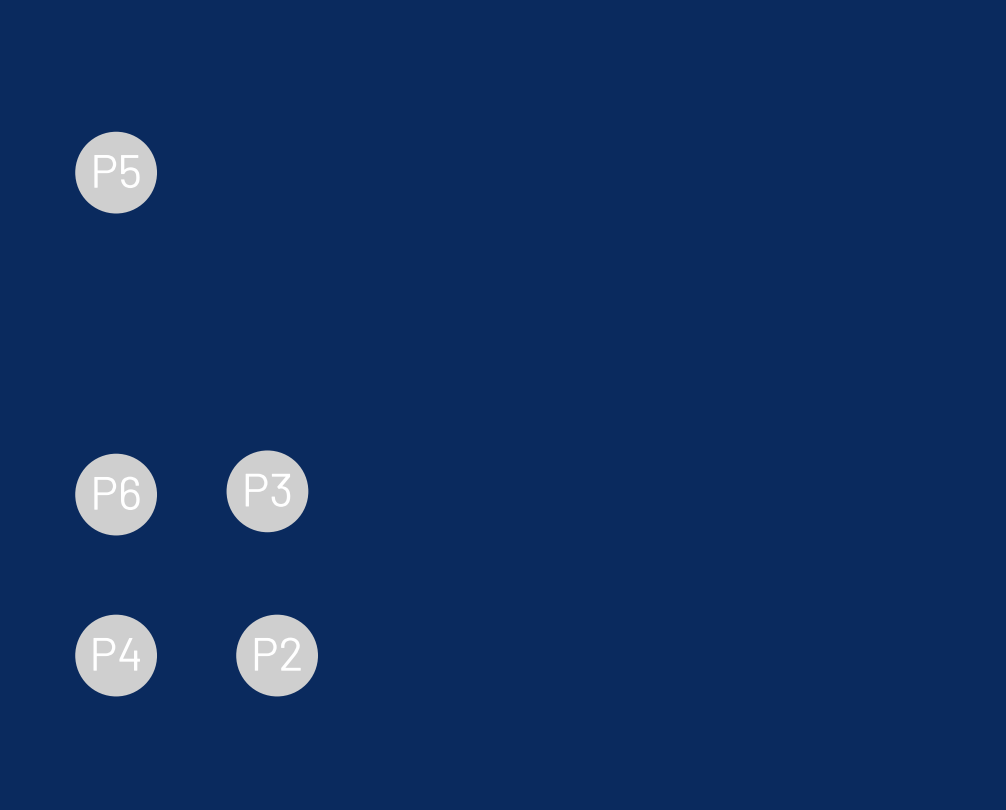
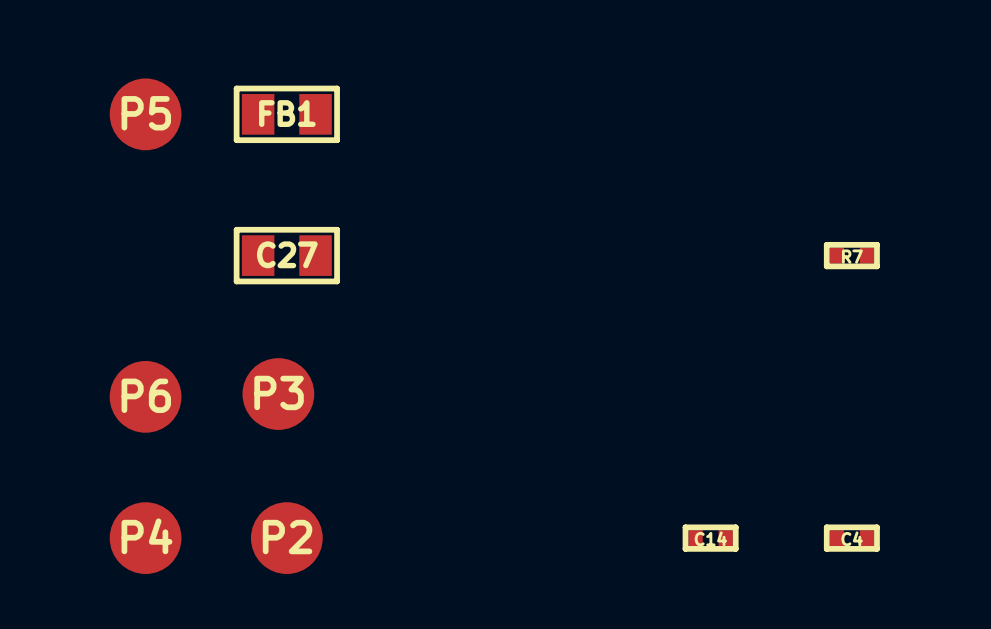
FB1: none -> (286, 114)
C27: none -> (286, 255)
R7: none -> (851, 255)
C14: none -> (710, 538)
C4: none -> (851, 538)

